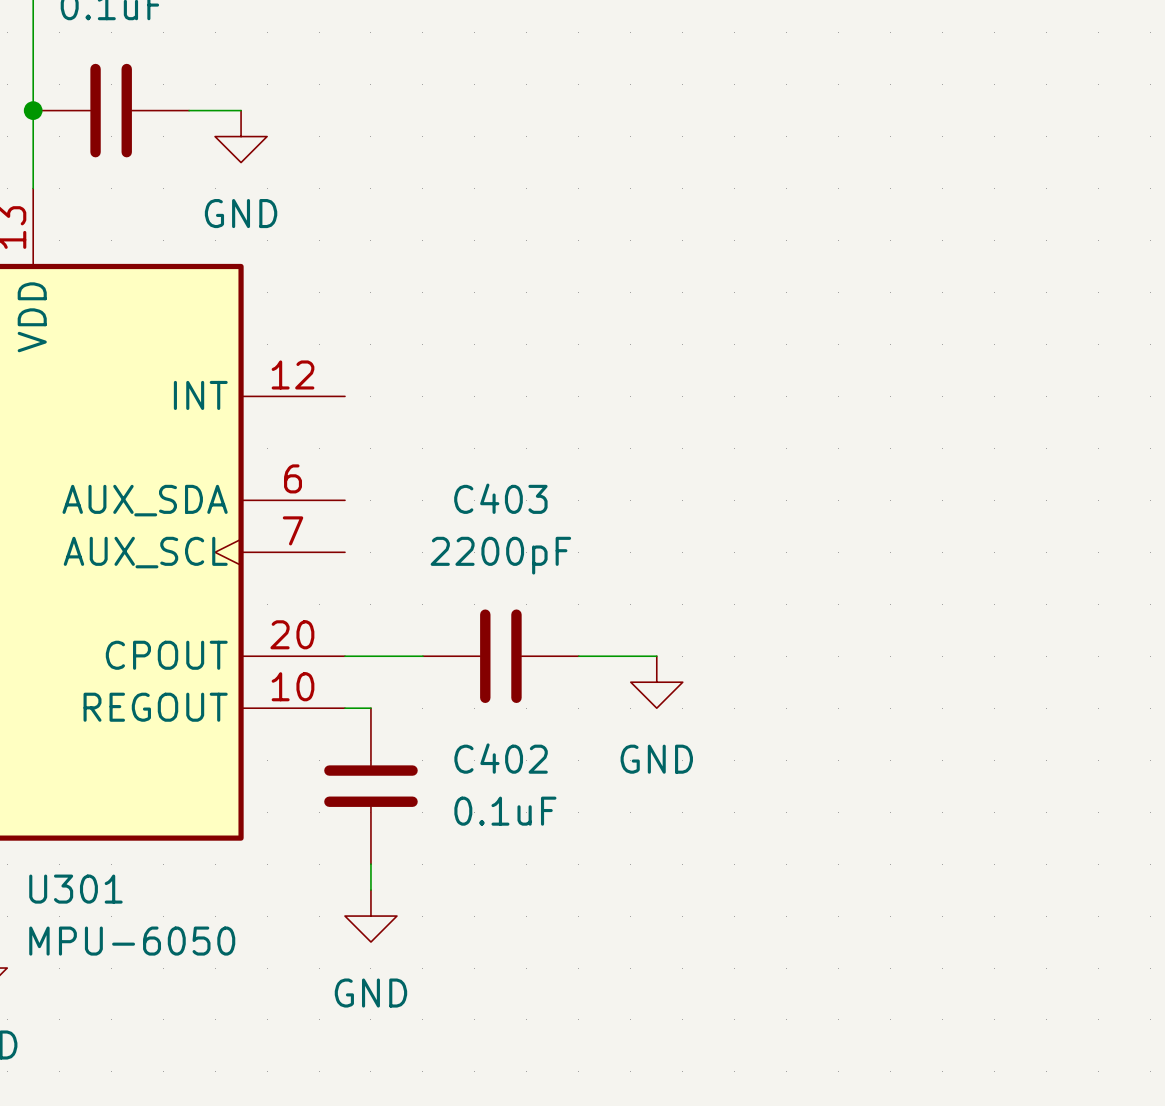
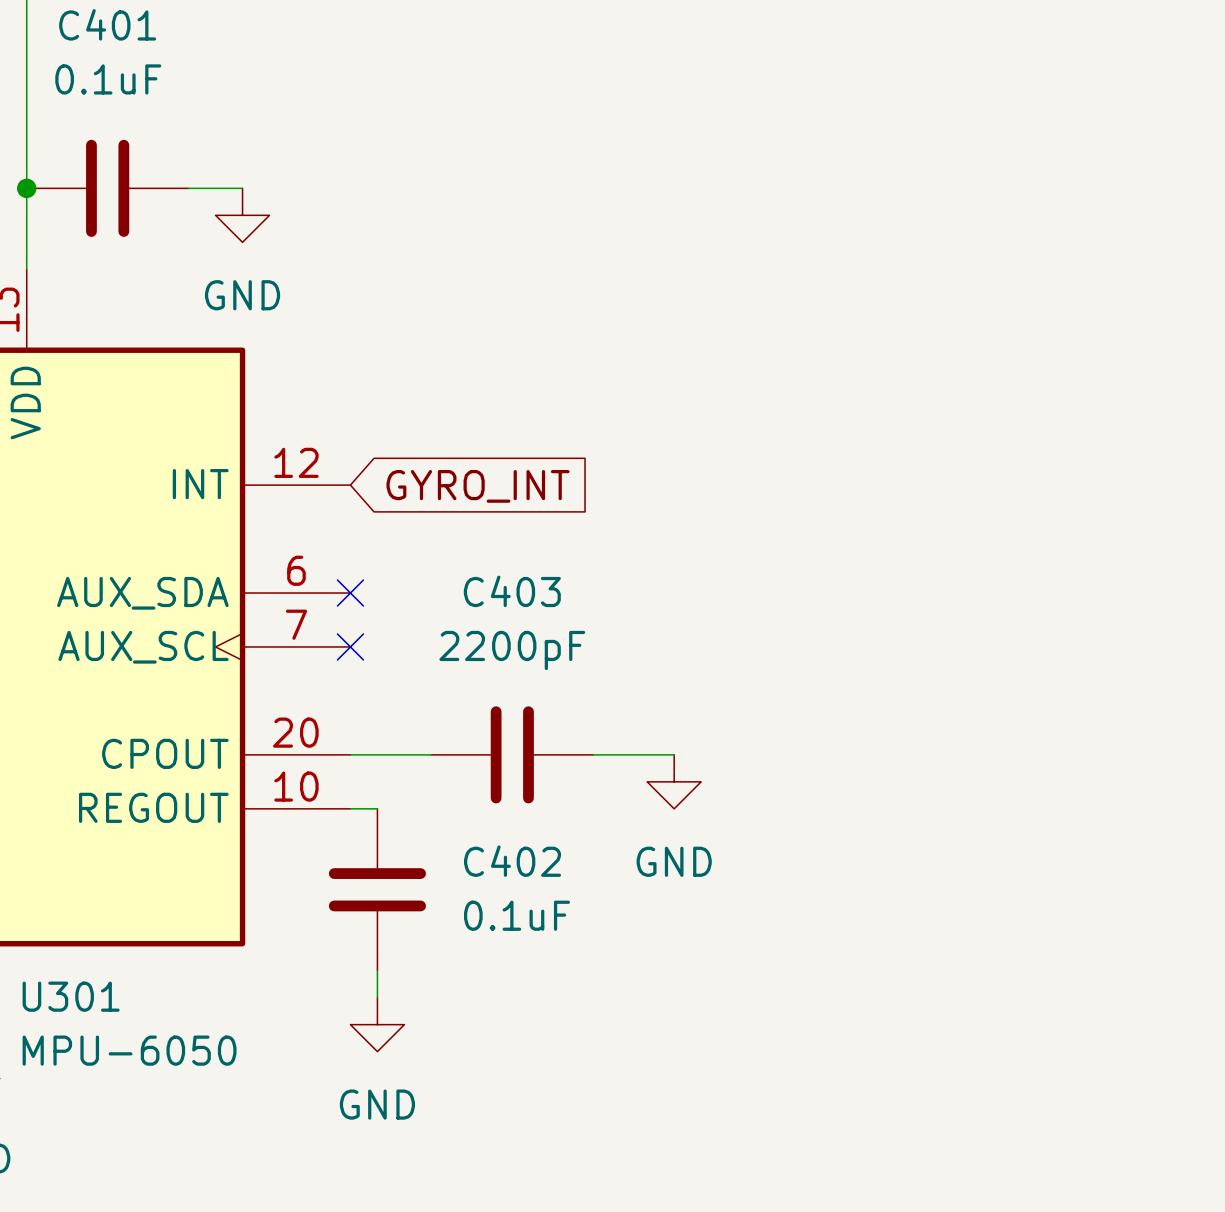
global label: none -> GYRO_INT (477, 486)
no-connect mark: none -> (350, 593)
no-connect mark: none -> (350, 646)

